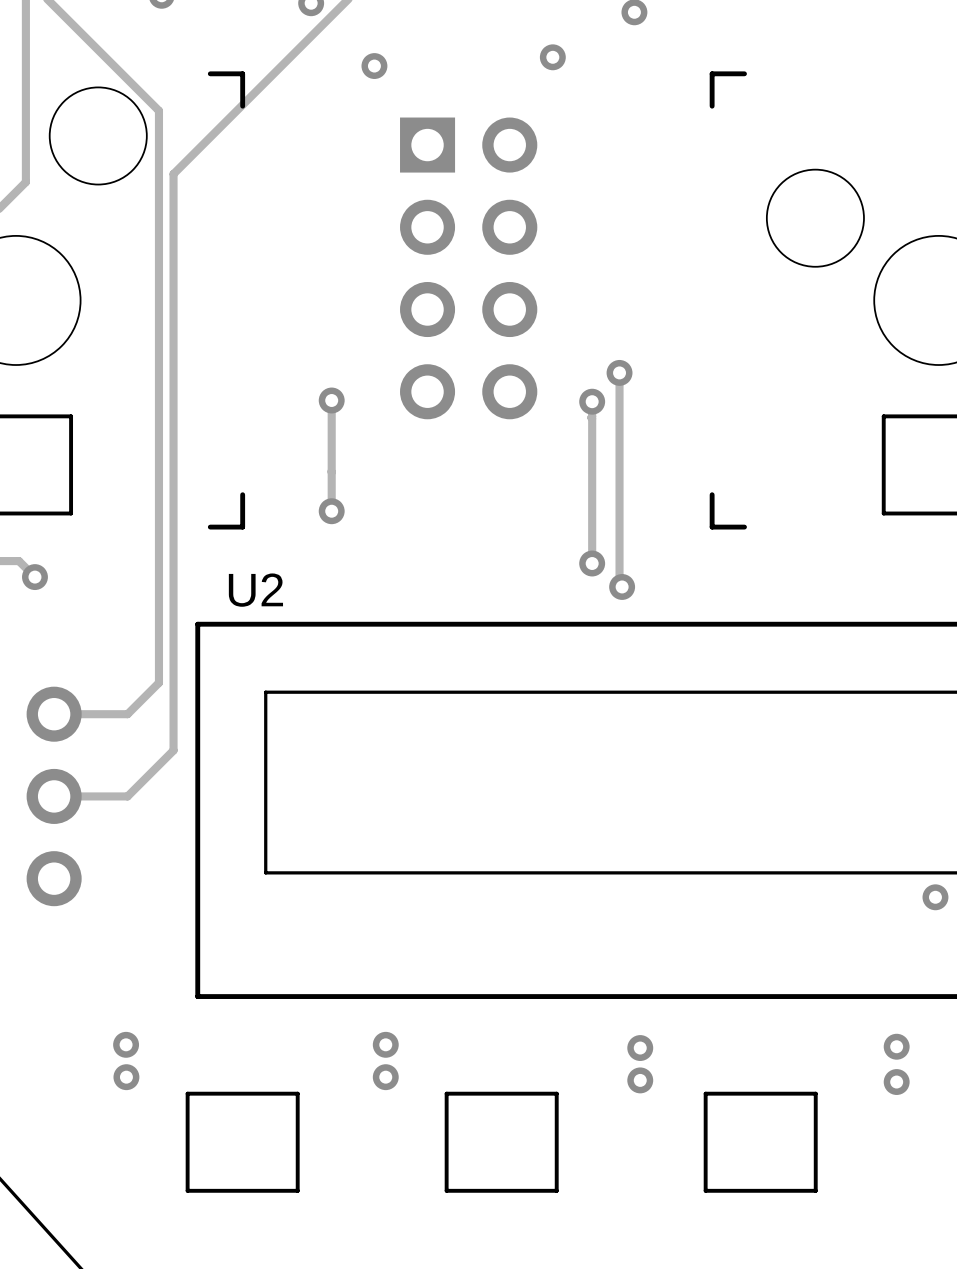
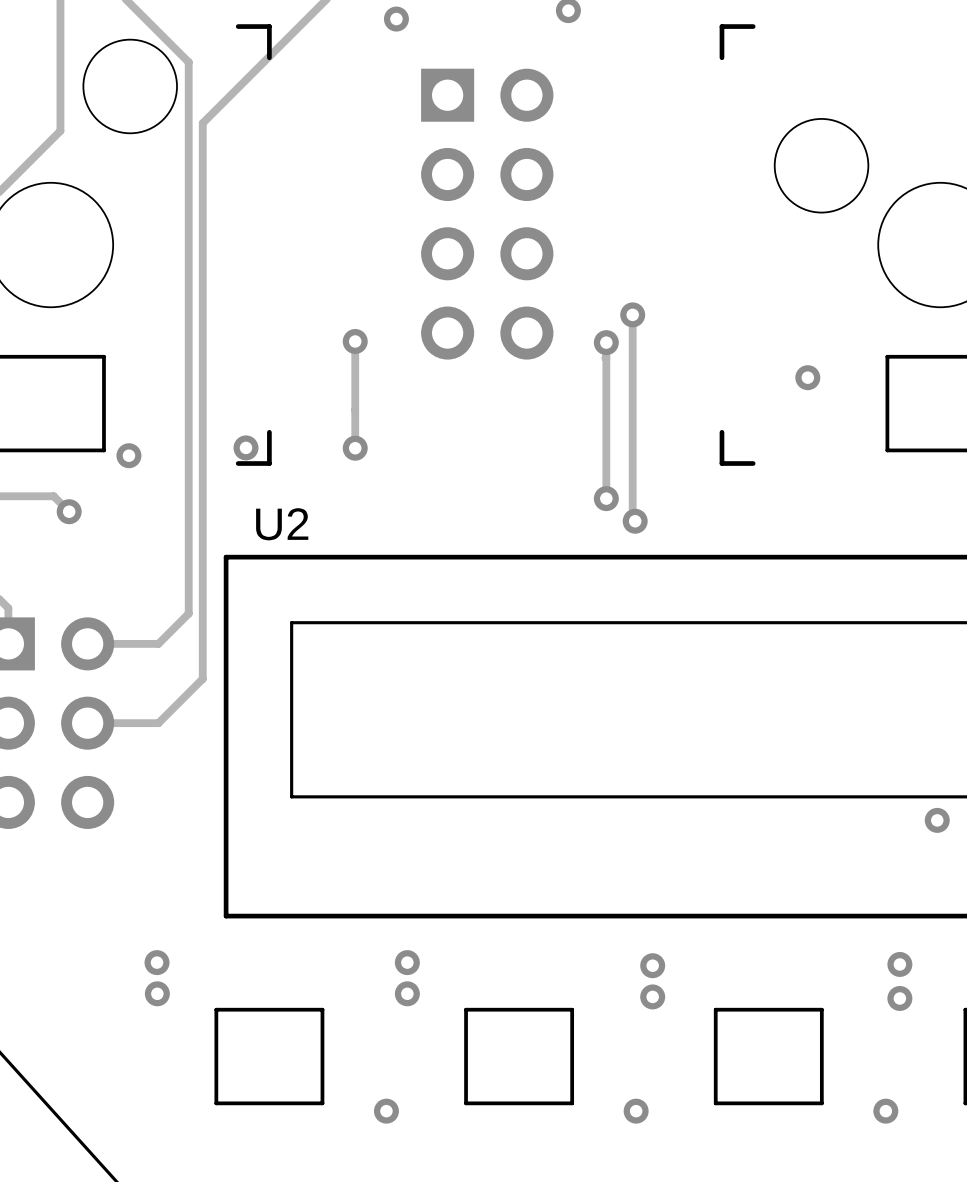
via: none -> (807, 377)
via: none -> (245, 447)
via: none -> (128, 455)
via: none -> (386, 1111)
via: none -> (636, 1111)
via: none -> (885, 1111)

